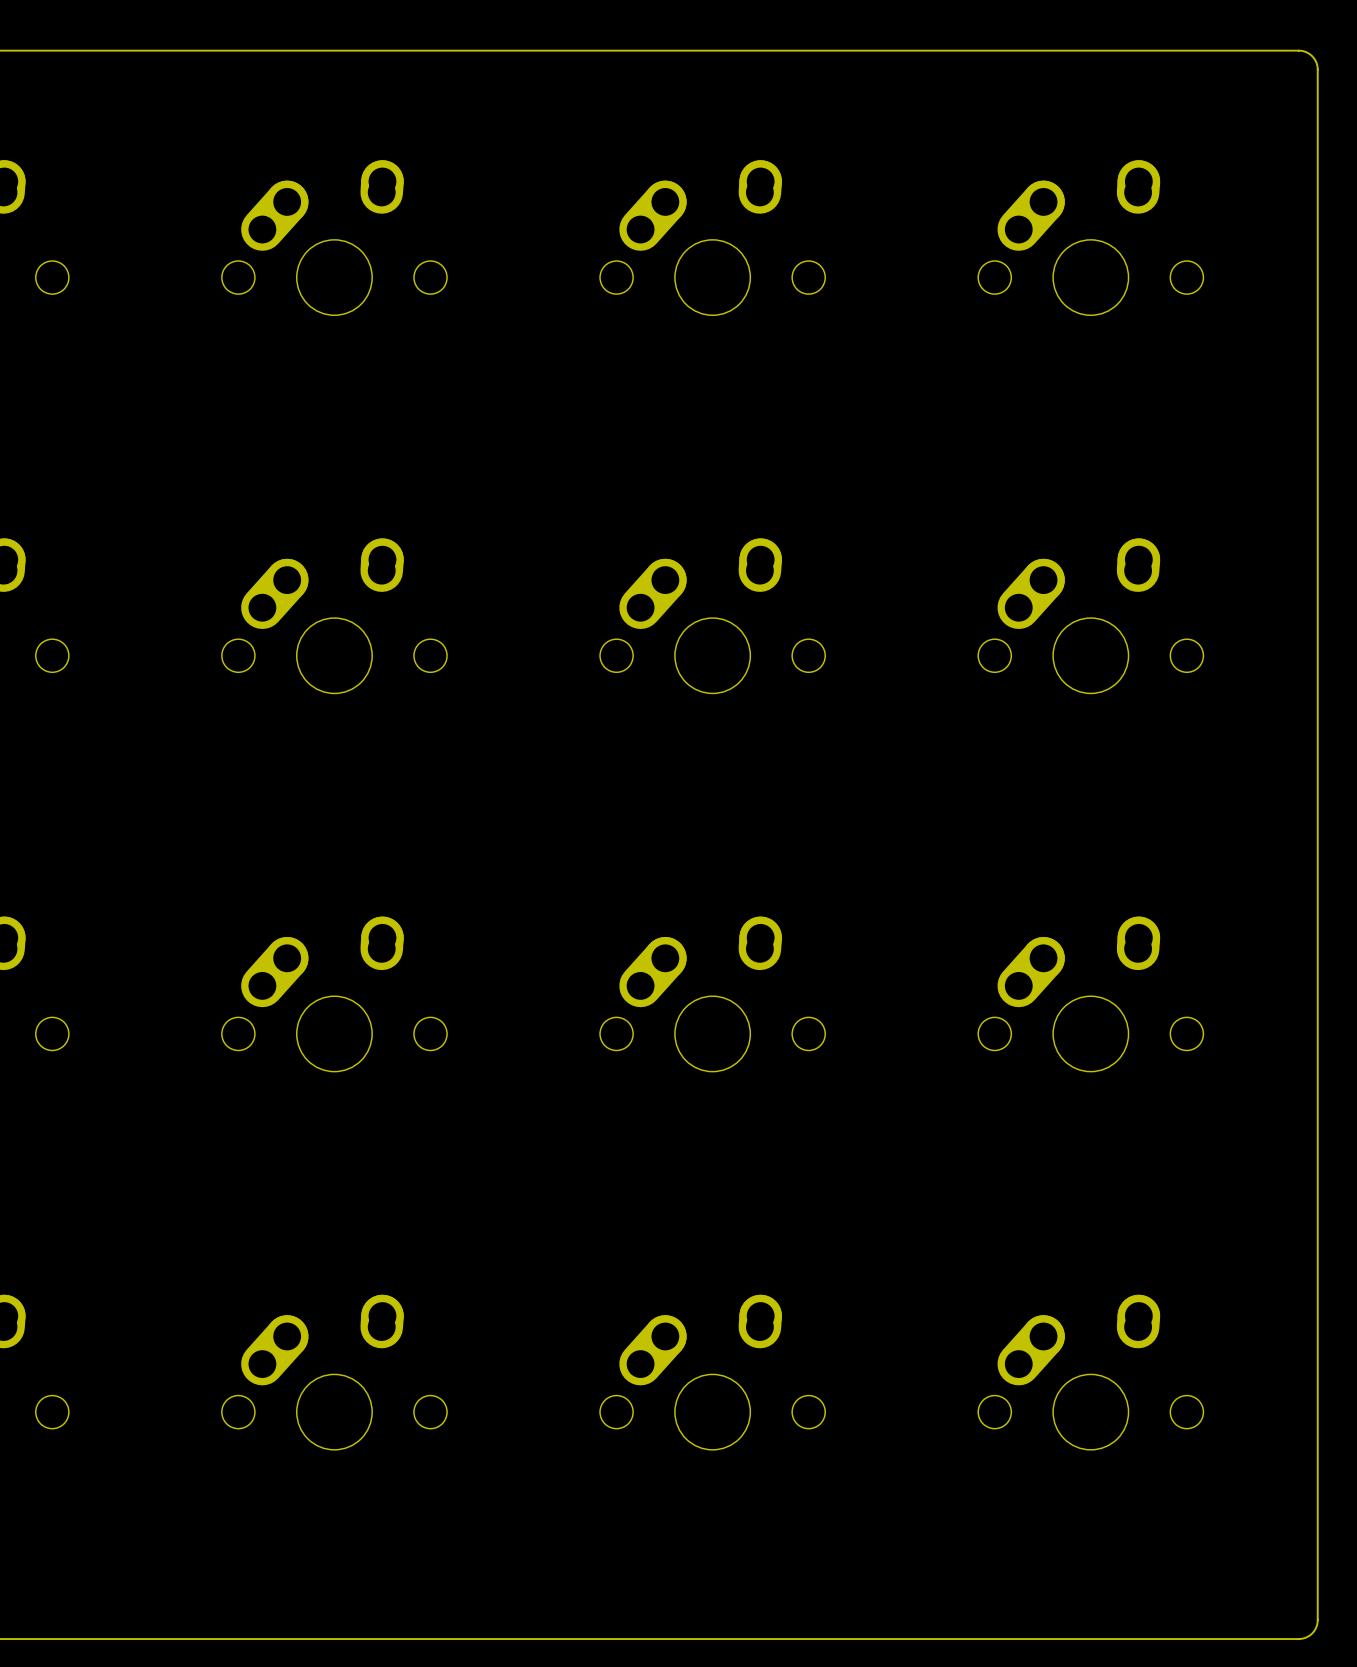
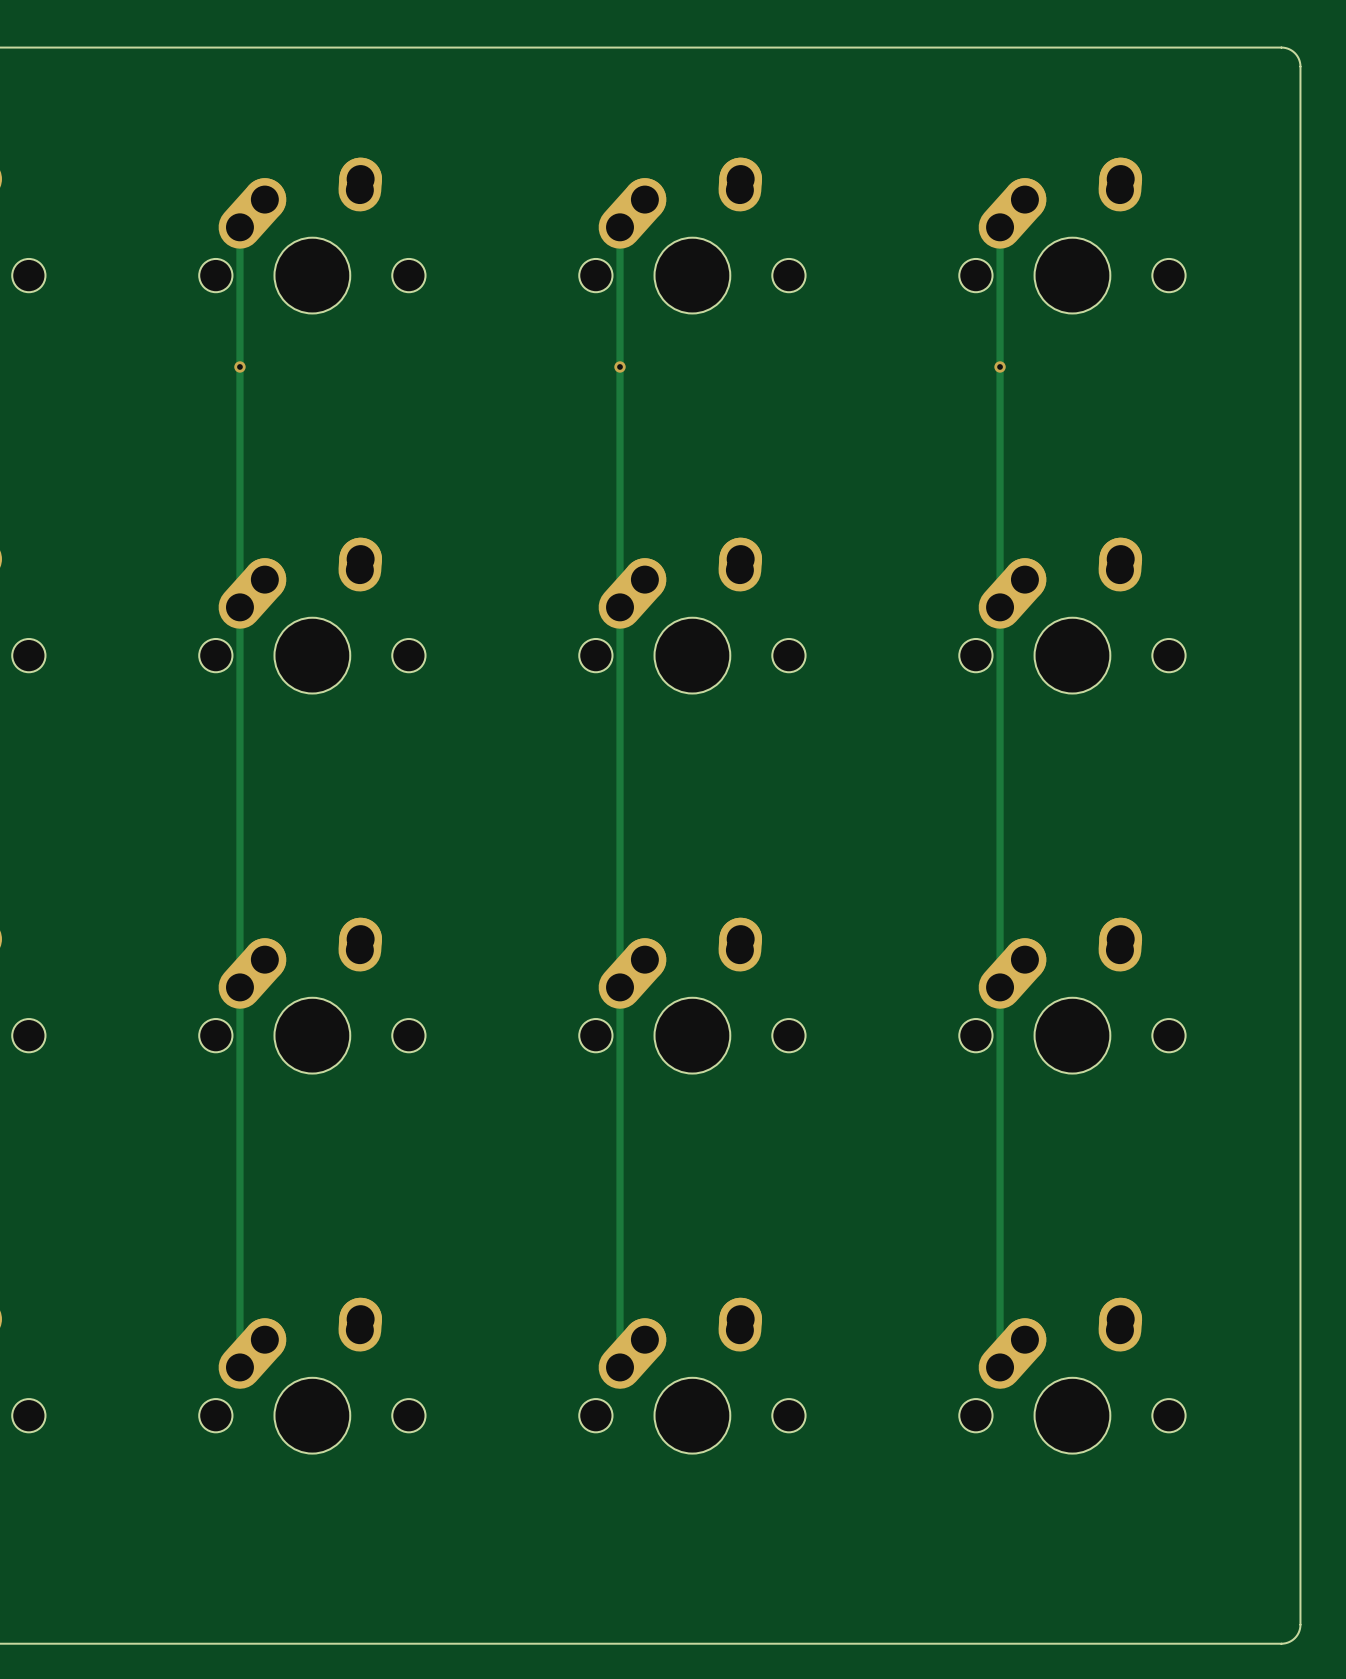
track: none -> (239, 227) (239, 1367)
track: none -> (620, 227) (620, 1367)
track: none -> (1000, 227) (1000, 1367)
via: none -> (239, 366)
via: none -> (620, 366)
via: none -> (1000, 366)

